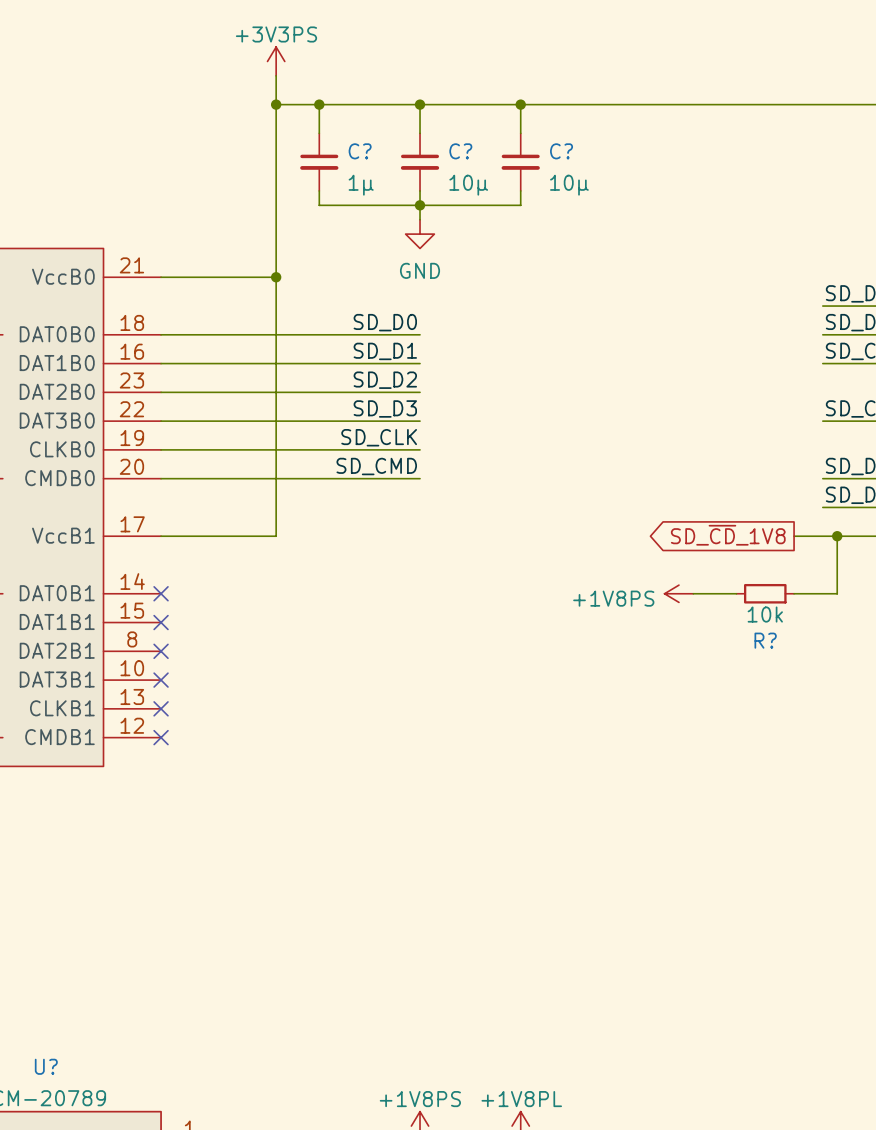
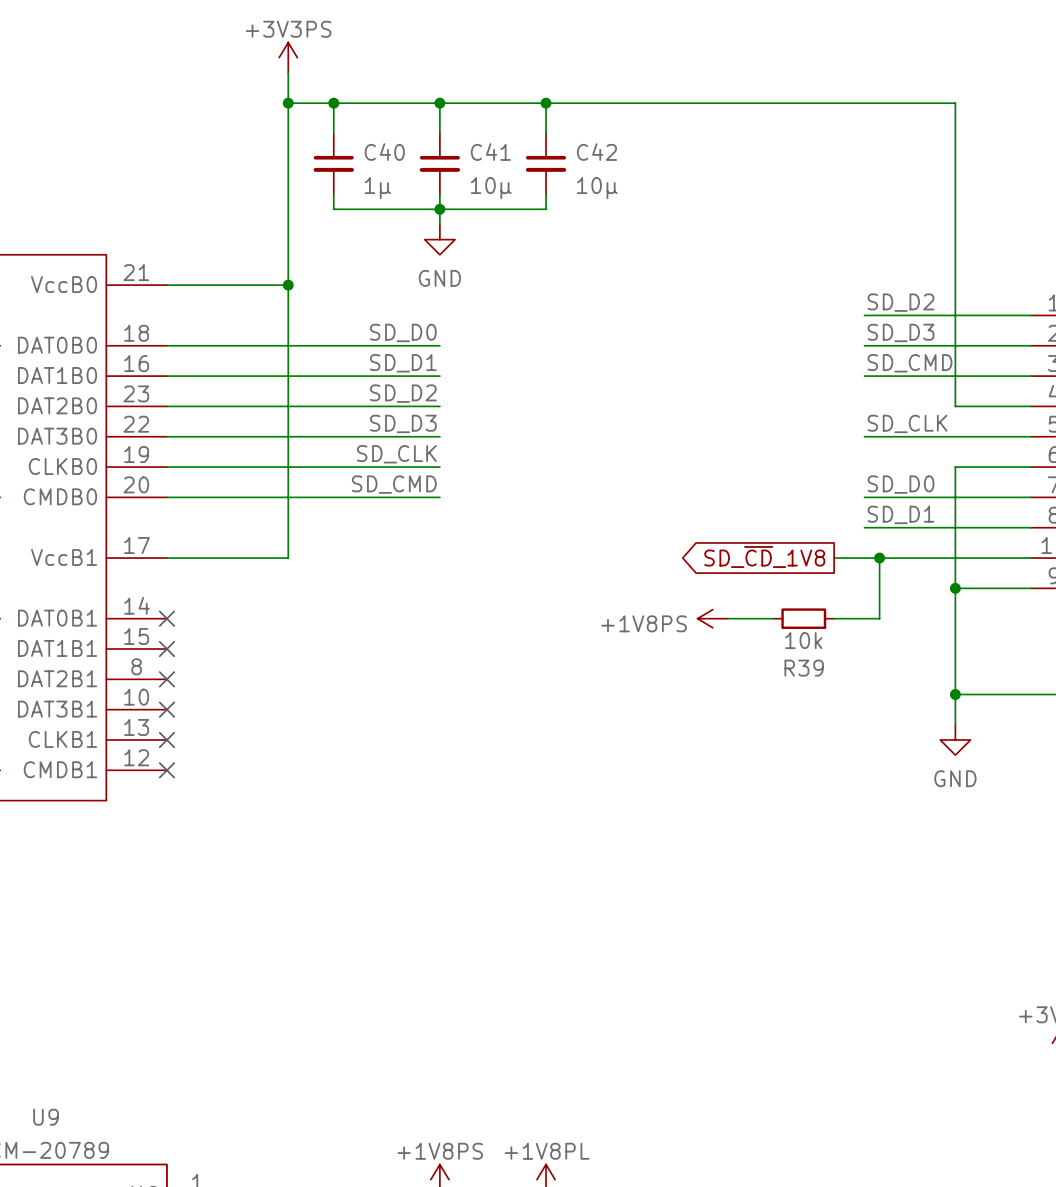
C? name: C? (360, 151) -> C40 (384, 152)
C? name: C? (460, 151) -> C41 (490, 152)
C? name: C? (561, 151) -> C42 (596, 152)
R? name: R? (765, 640) -> R39 (804, 668)
U? name: U? (46, 1066) -> U9 (46, 1117)

